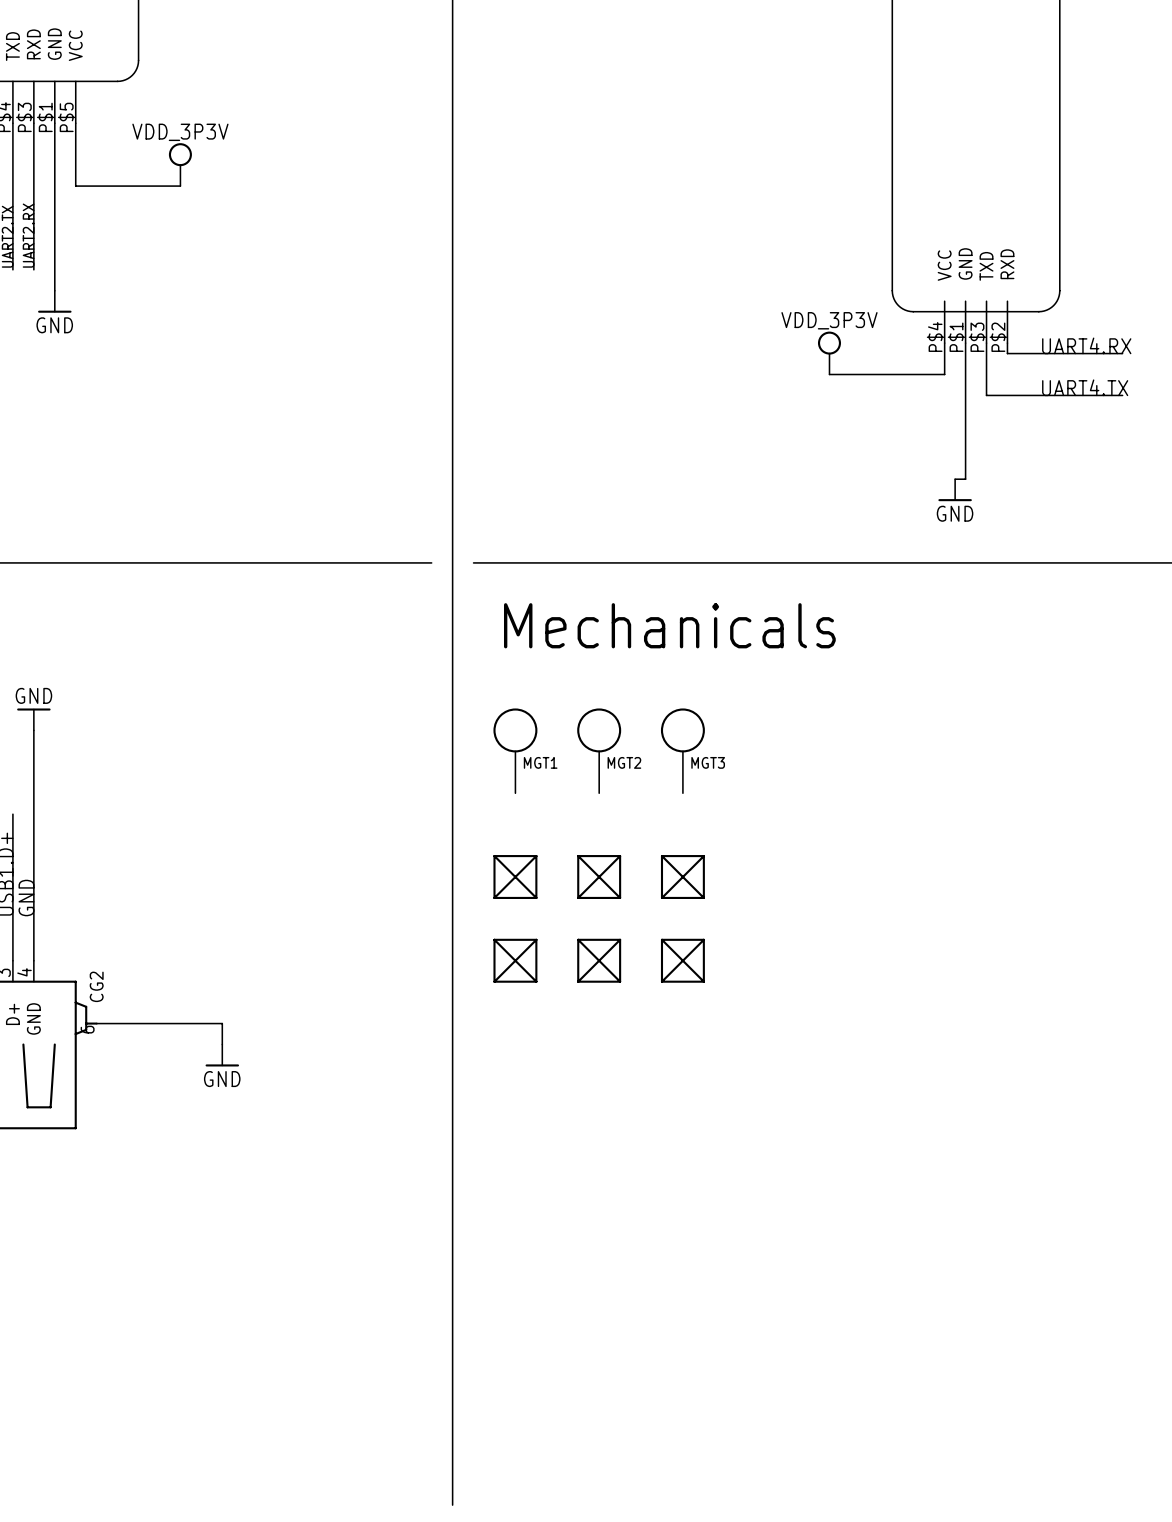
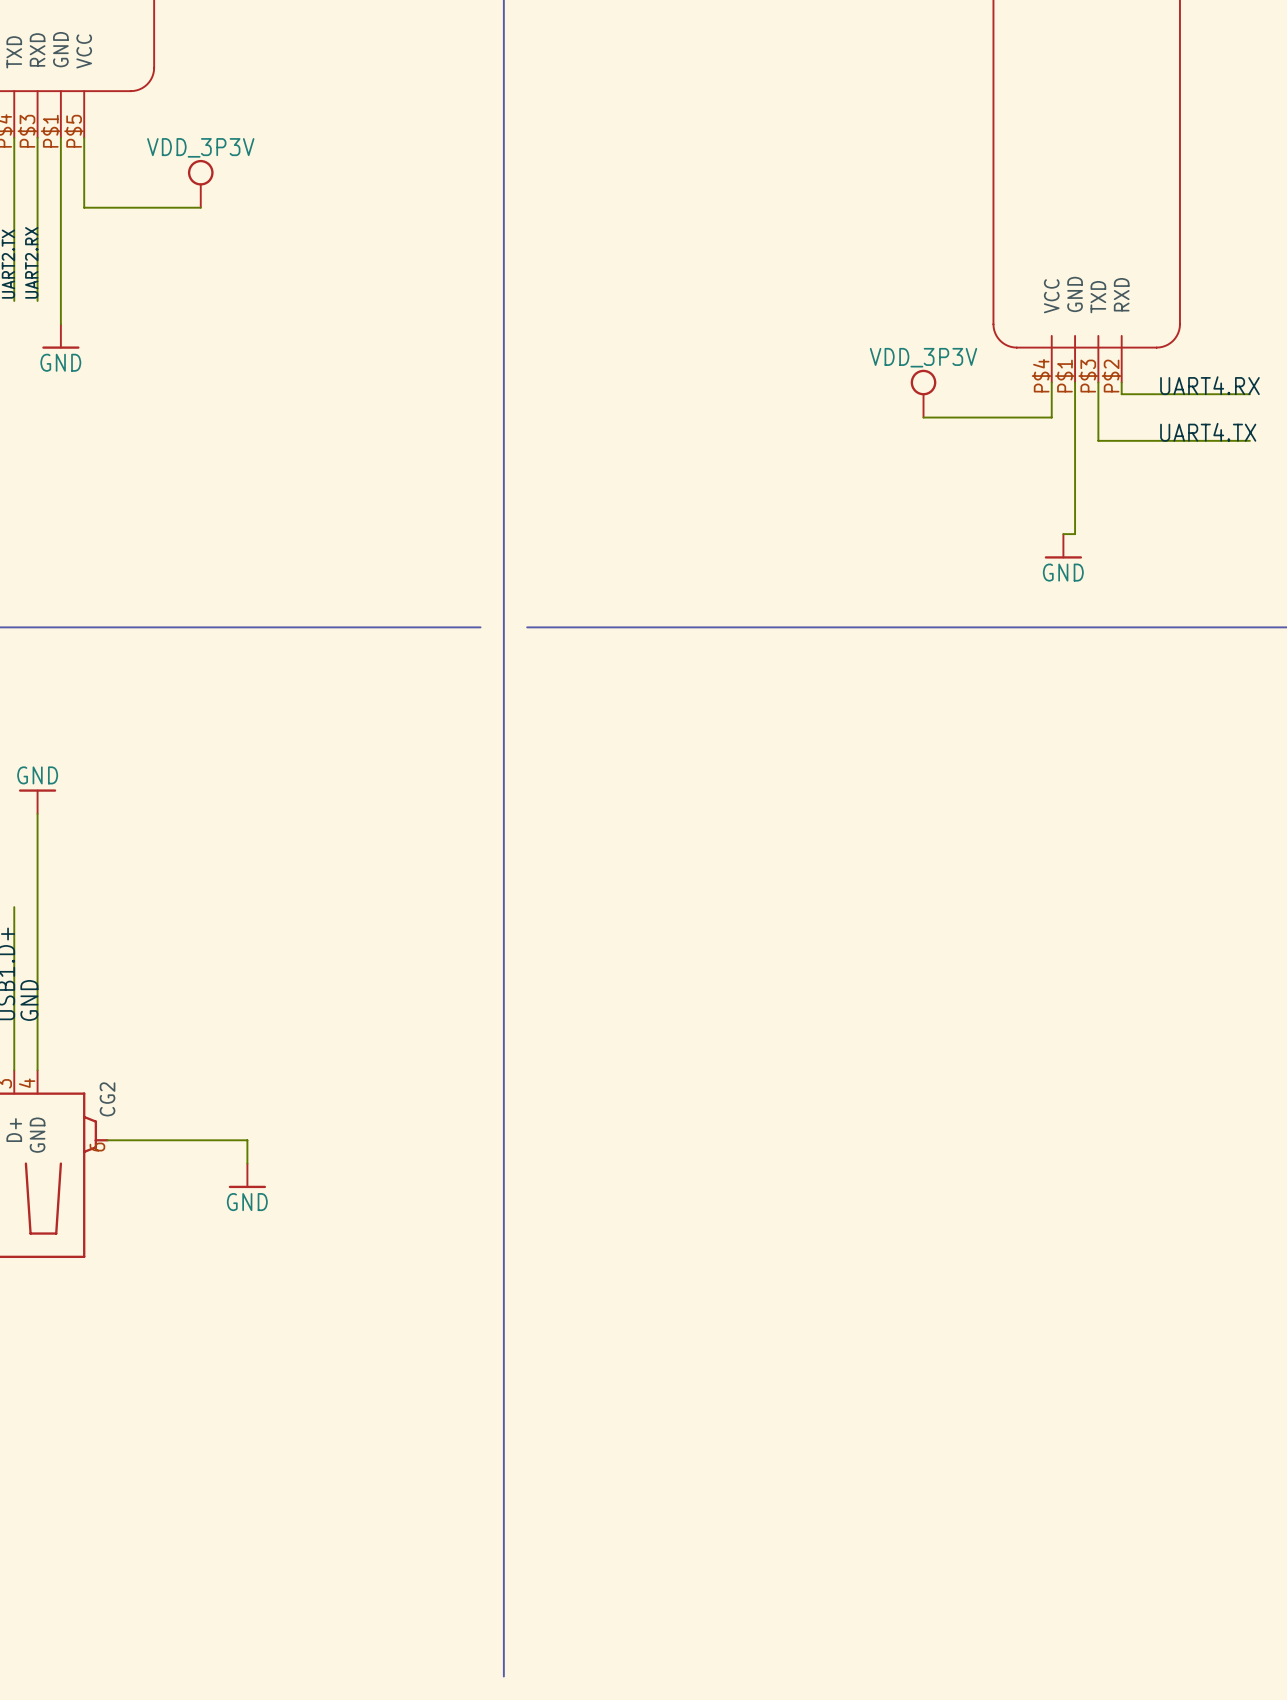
text: Mechanicals (669, 625) -> none
MGT1: (515, 750) -> none
MGT2: (599, 750) -> none
MGT3: (682, 750) -> none
part: (515, 877) -> none
part: (599, 877) -> none
part: (682, 877) -> none
part: (515, 960) -> none
part: (599, 960) -> none
part: (682, 960) -> none

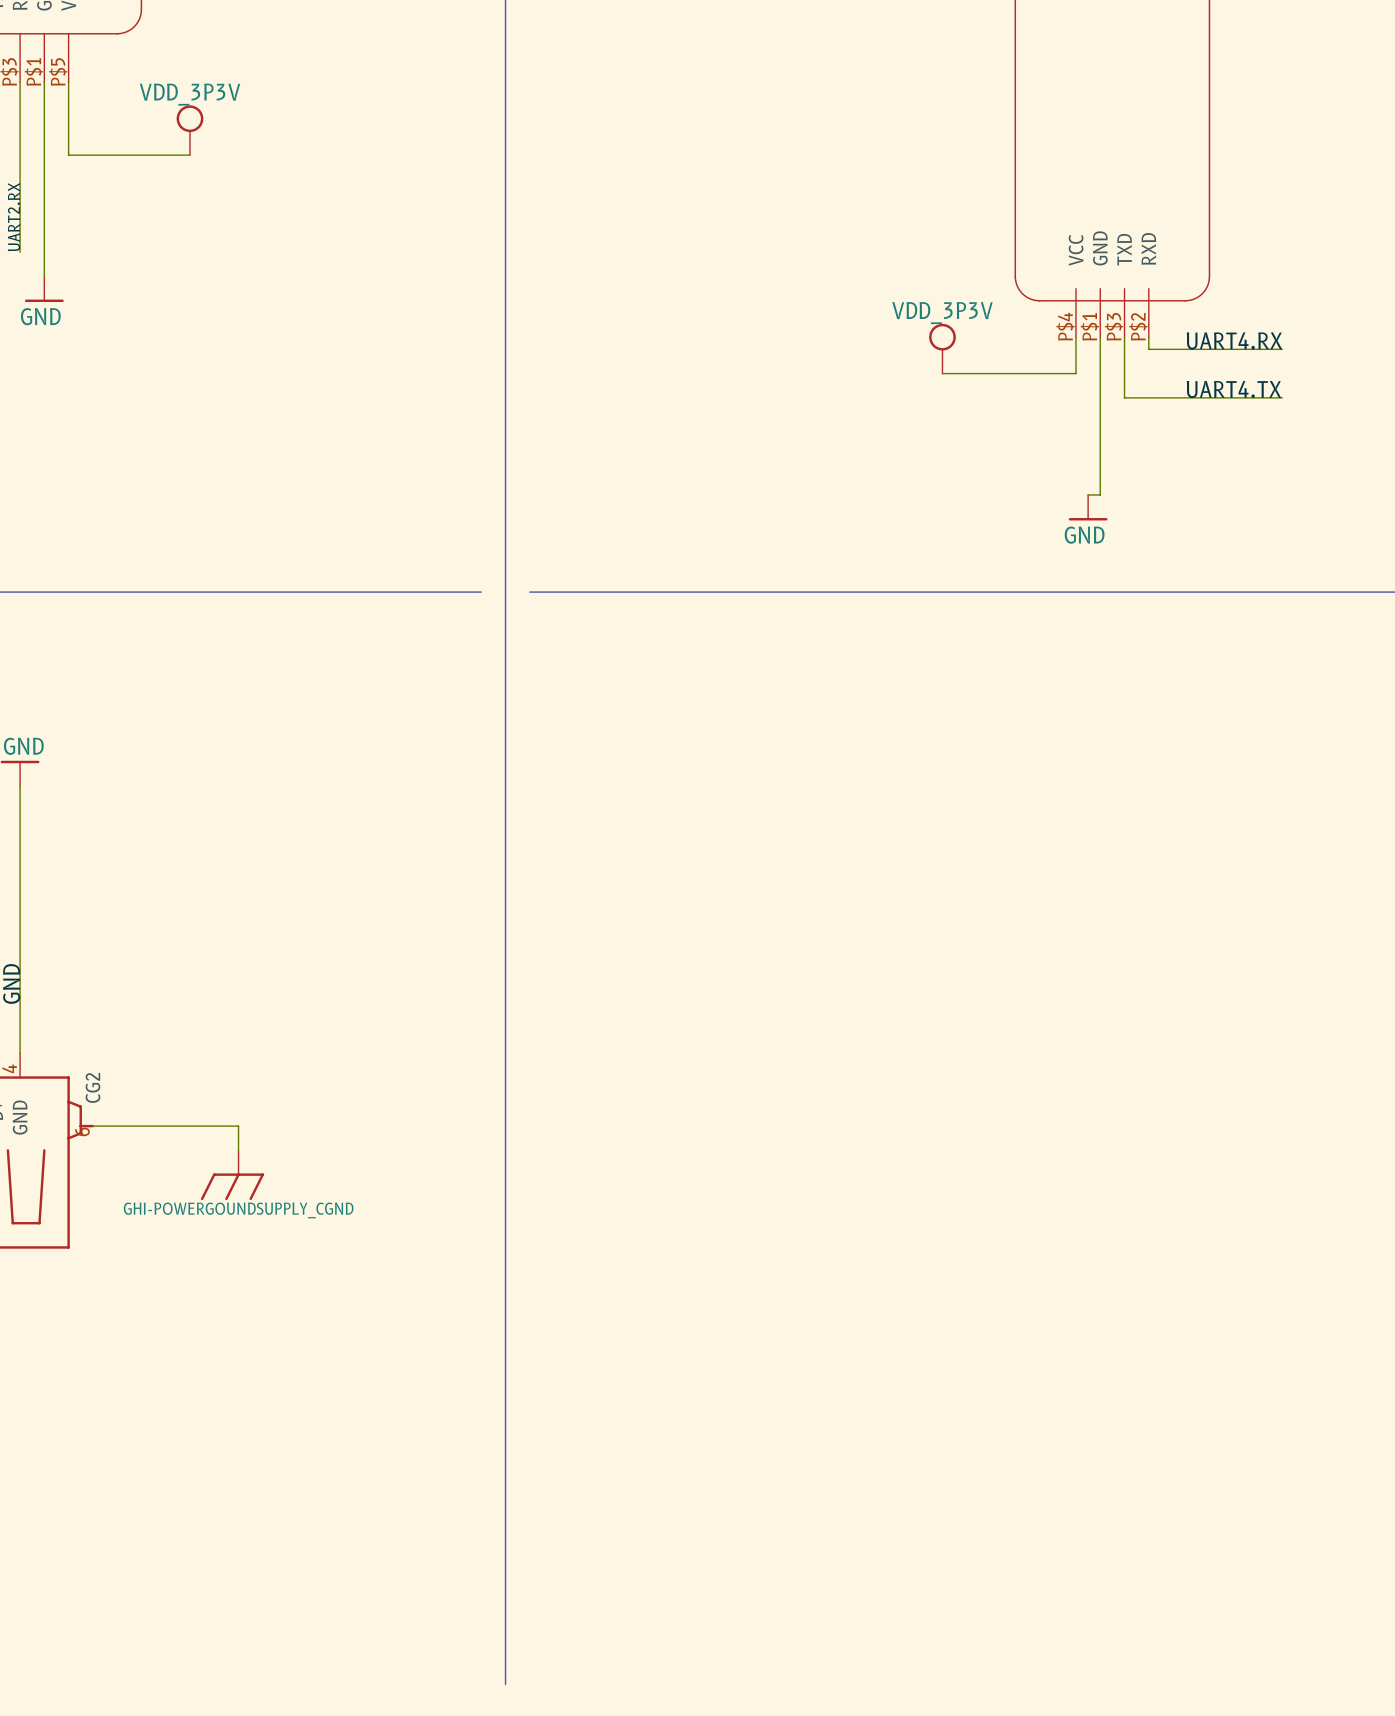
power symbol: GND (247, 1175) -> none
power symbol: none -> GHI-POWERGOUNDSUPPLY_CGND (232, 1175)

